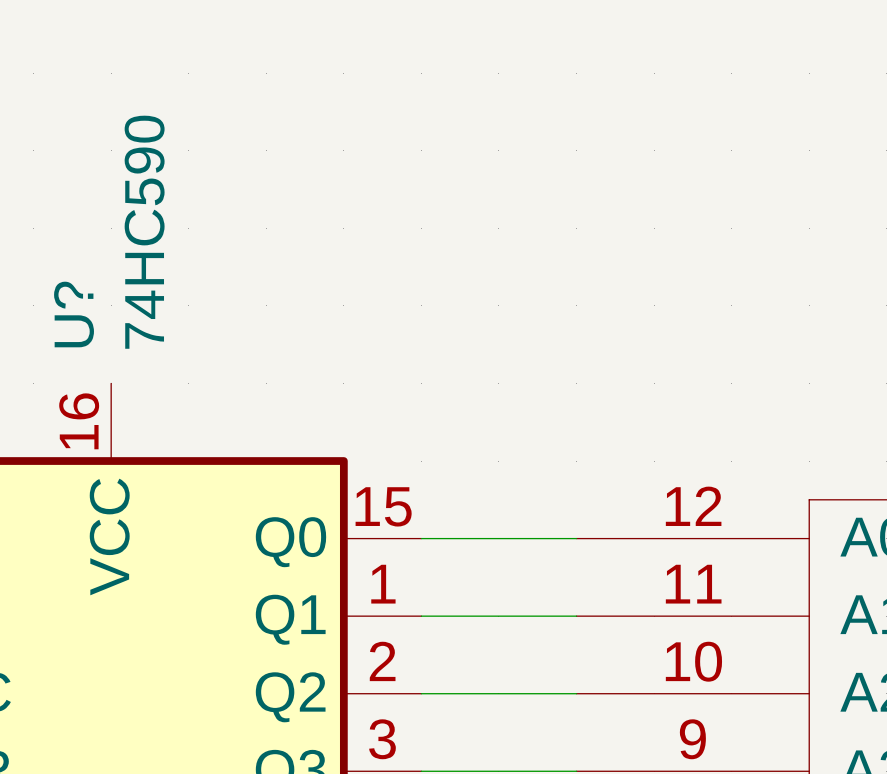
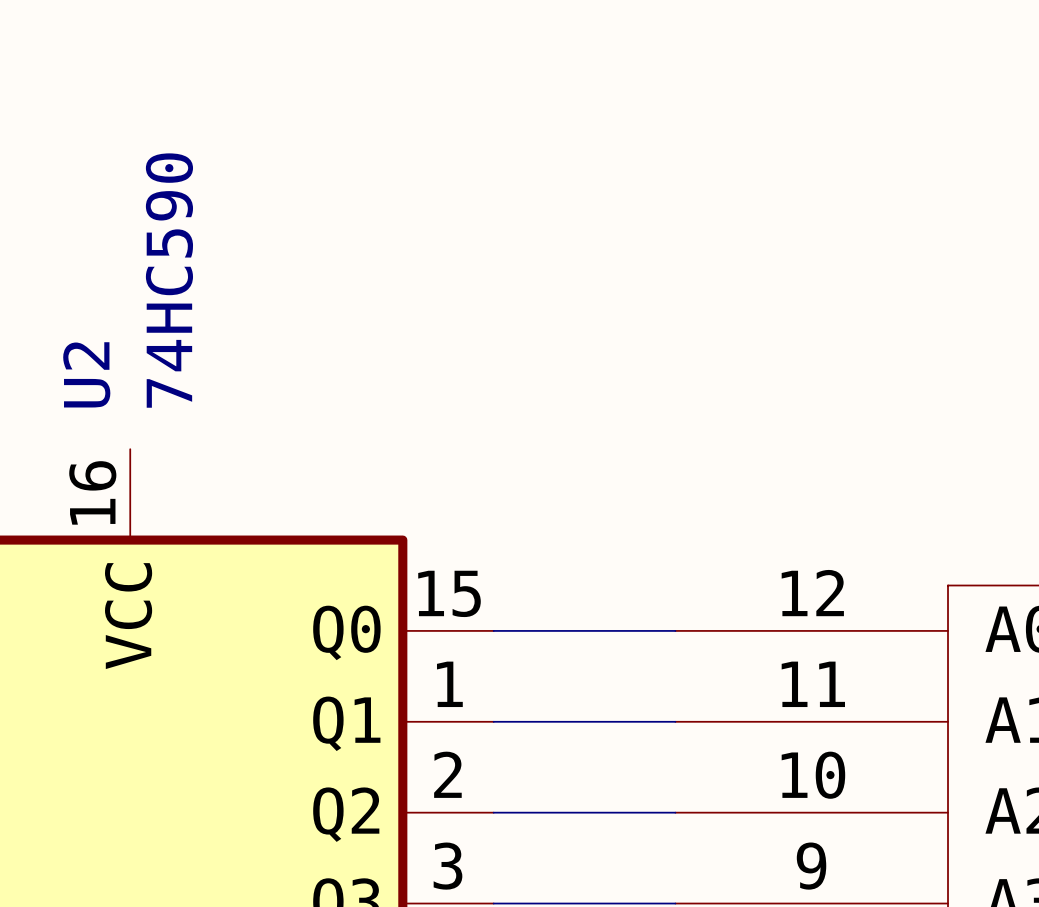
U? name: U? (74, 314) -> U2 (86, 374)

